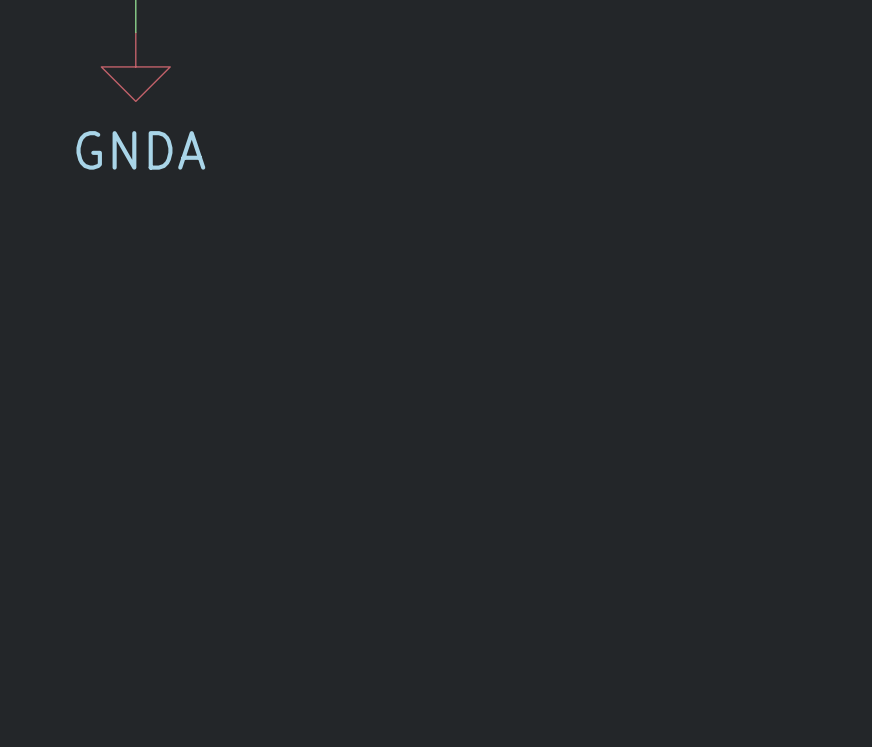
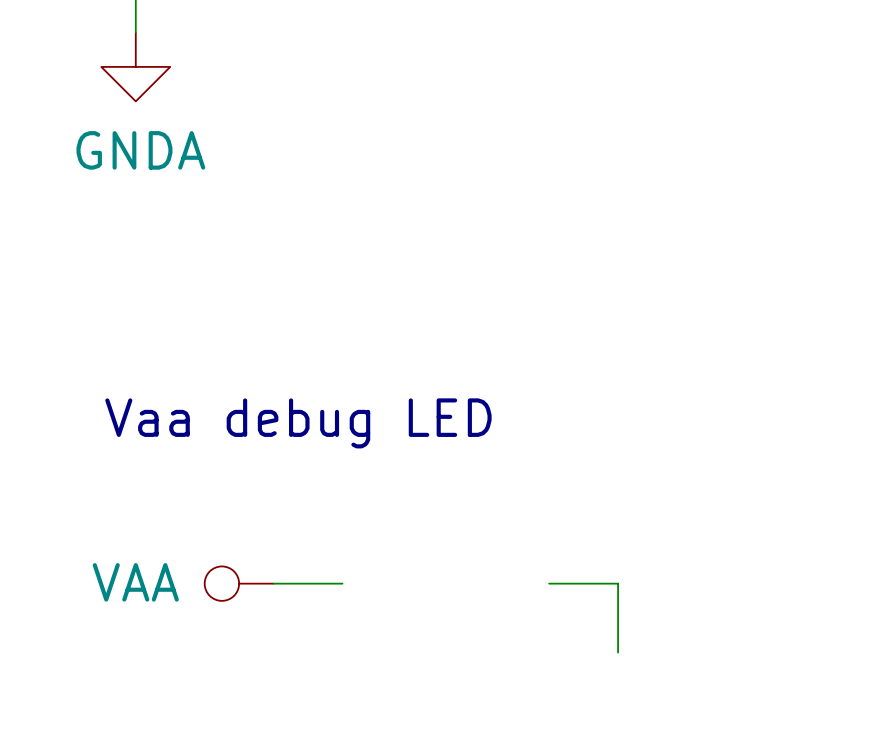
text: none -> Vaa debug LED (298, 423)
power symbol: none -> VAA (239, 583)
wire: none -> (273, 583) (342, 583)
wire: none -> (549, 583) (618, 583) (618, 652)

